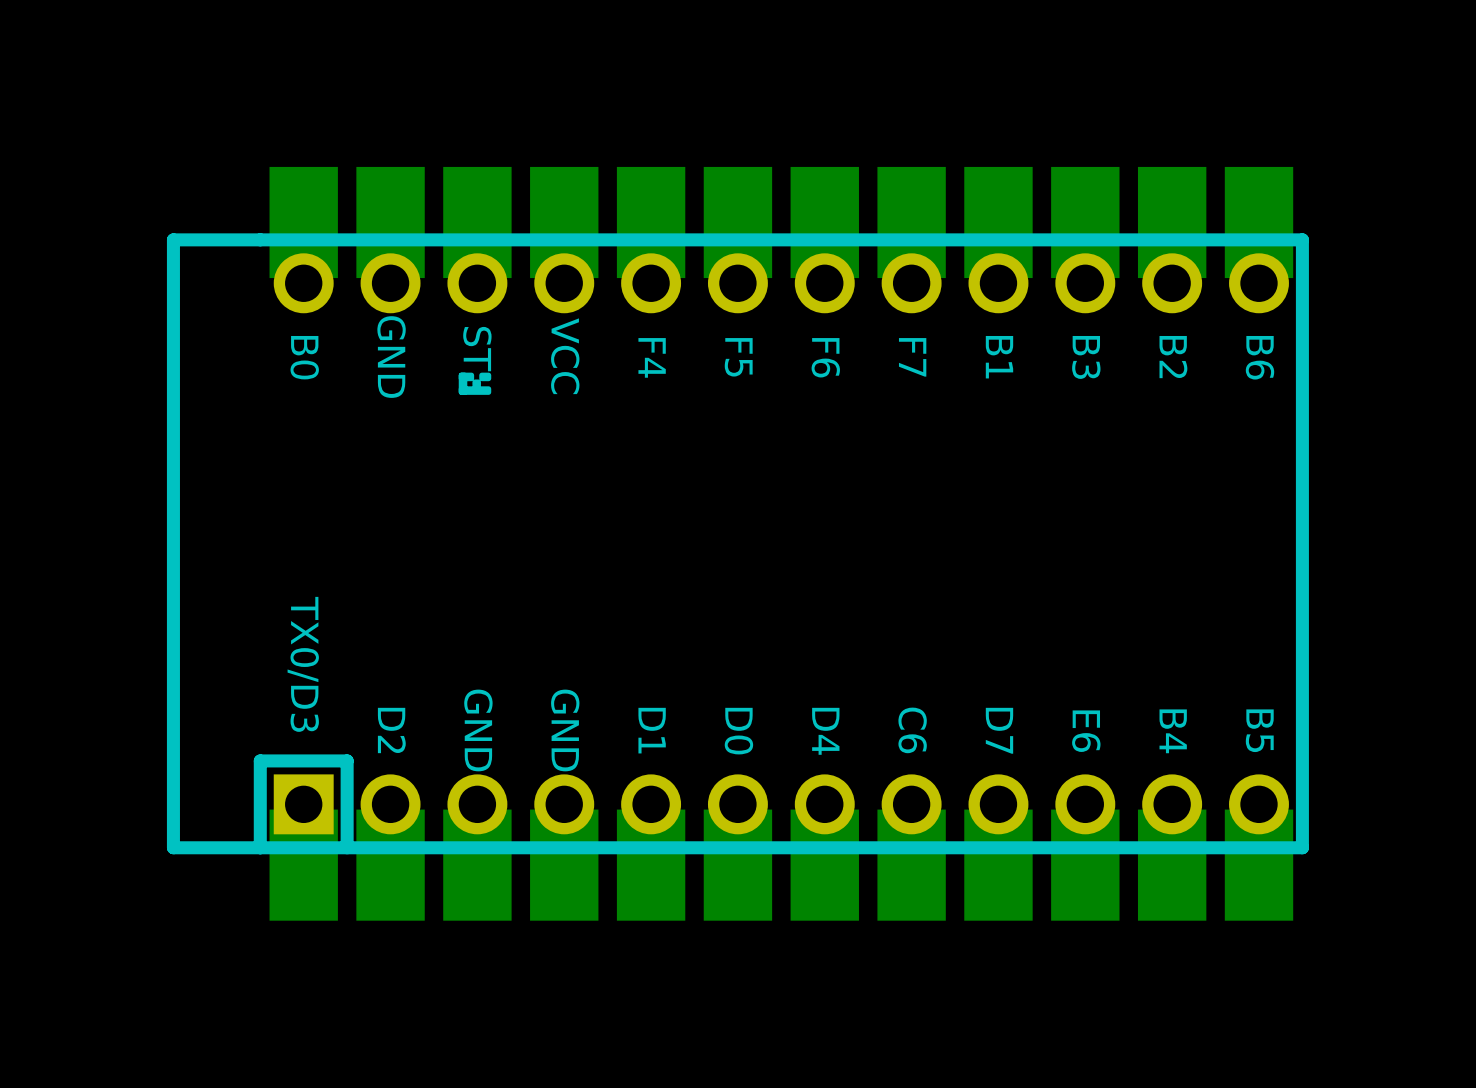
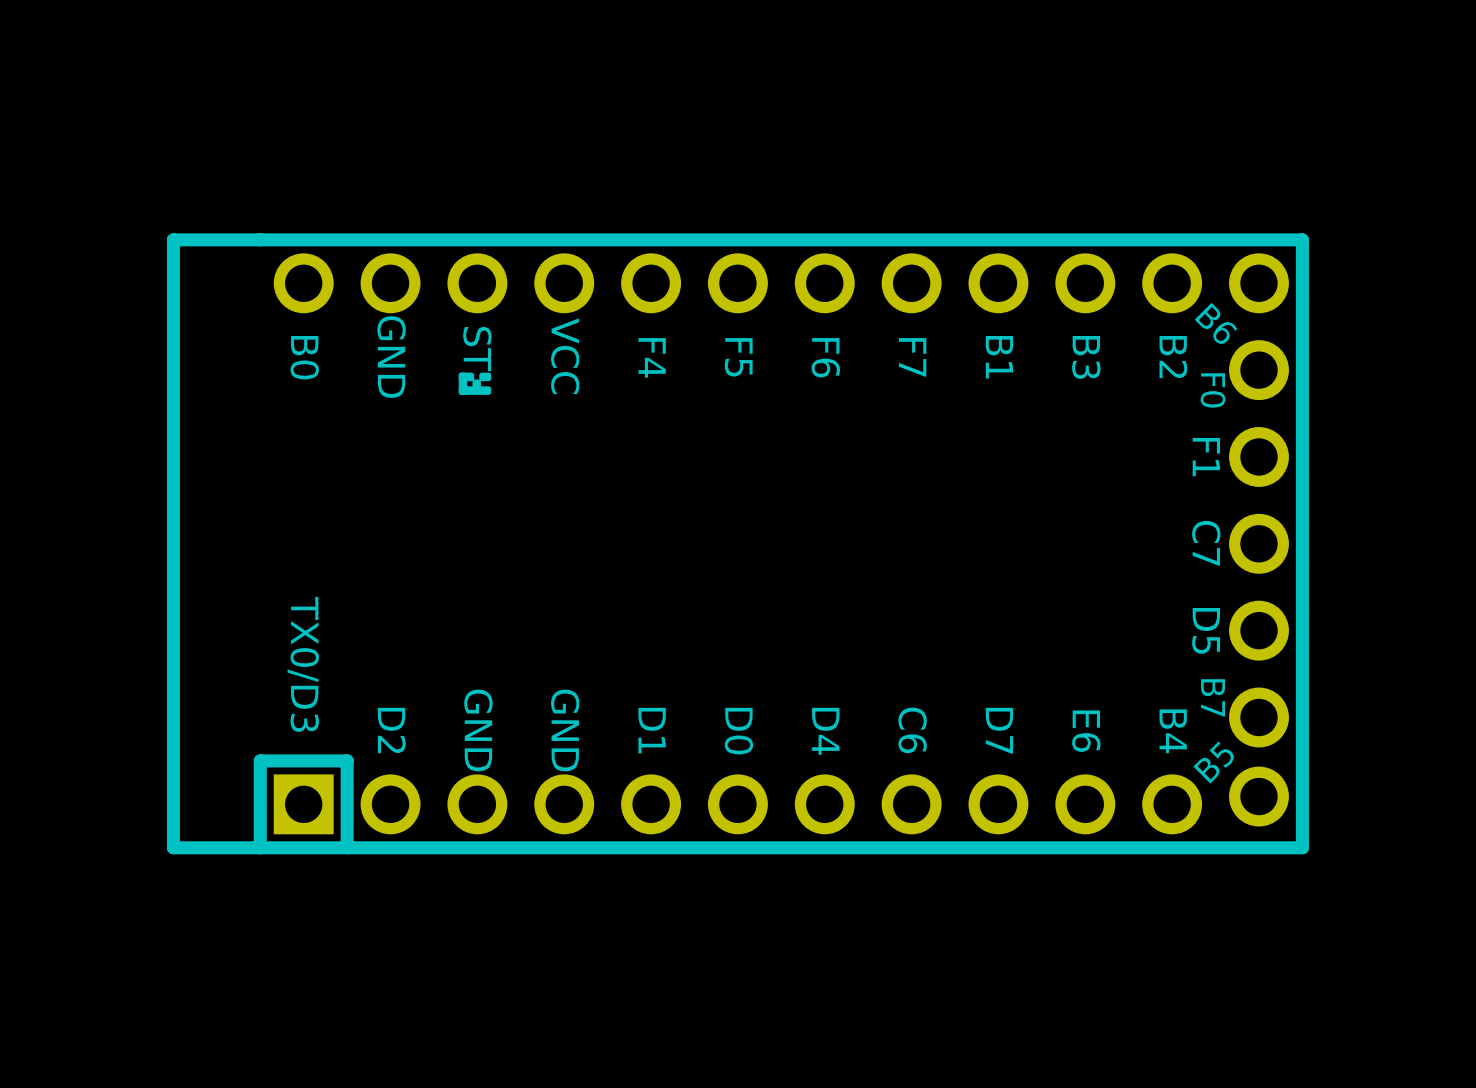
part footprint: [166, 166, 1309, 921] -> [166, 233, 1309, 855]

